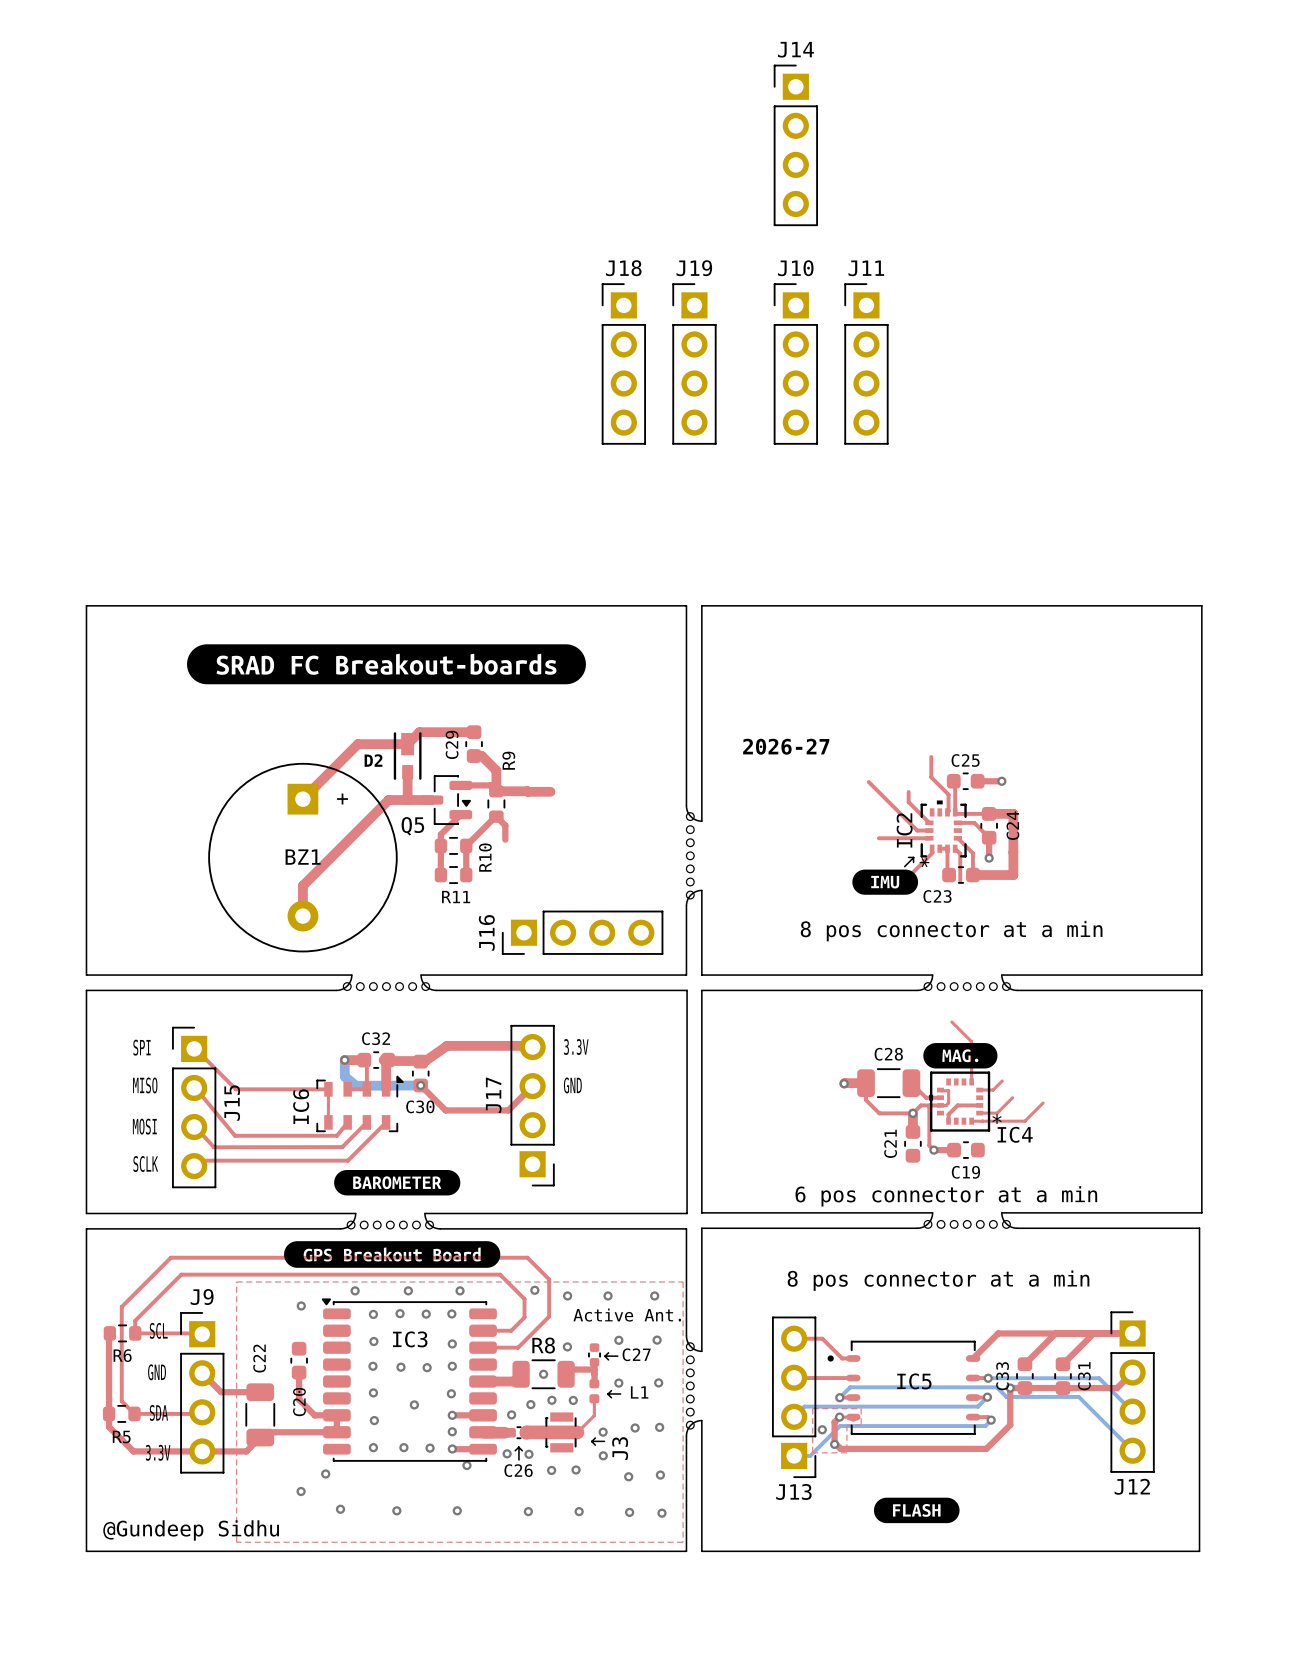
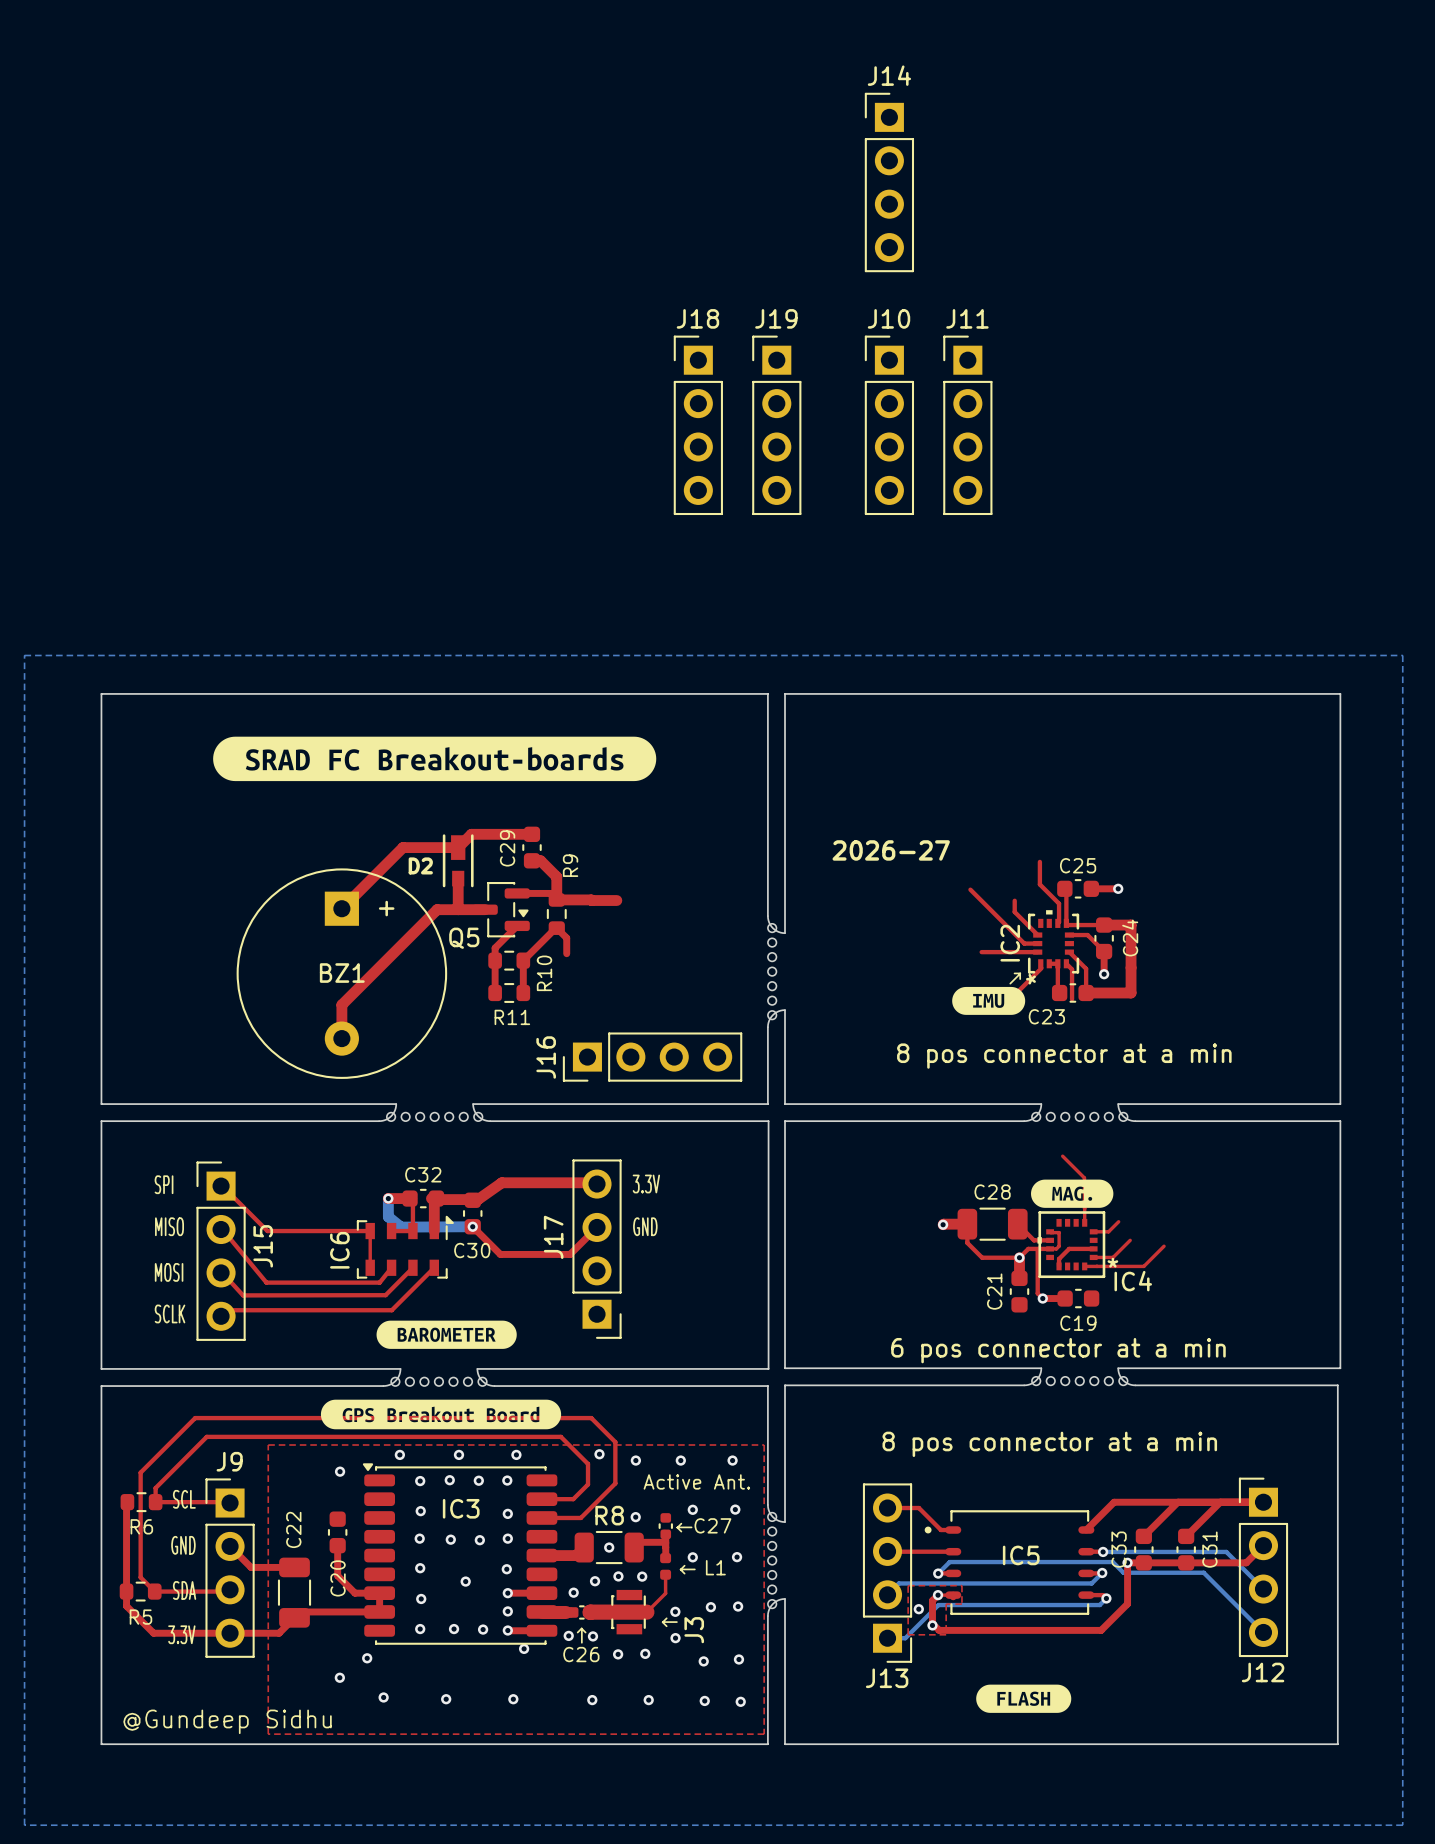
bottom zone outline: none -> (24, 655) (1402, 655) (1402, 1825) (24, 1825) (24, 655)

